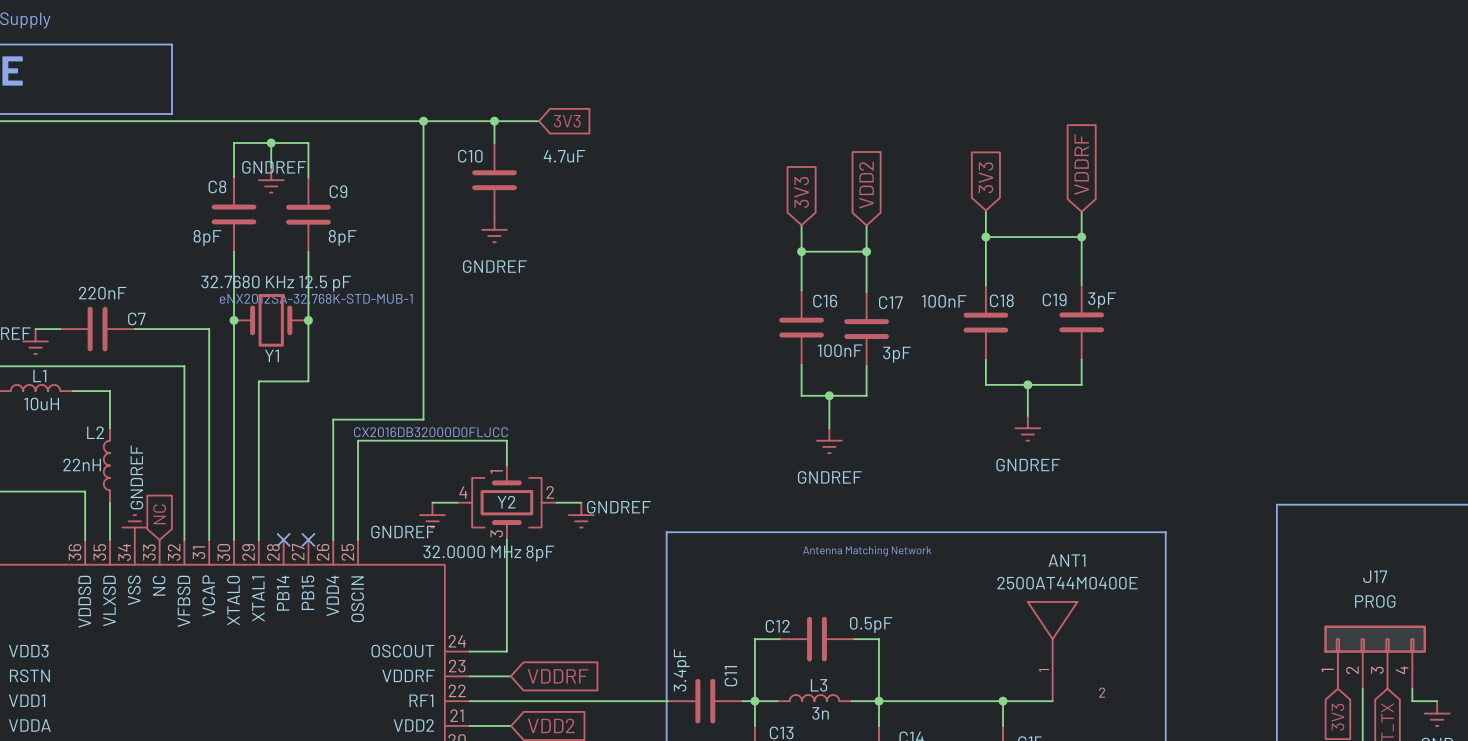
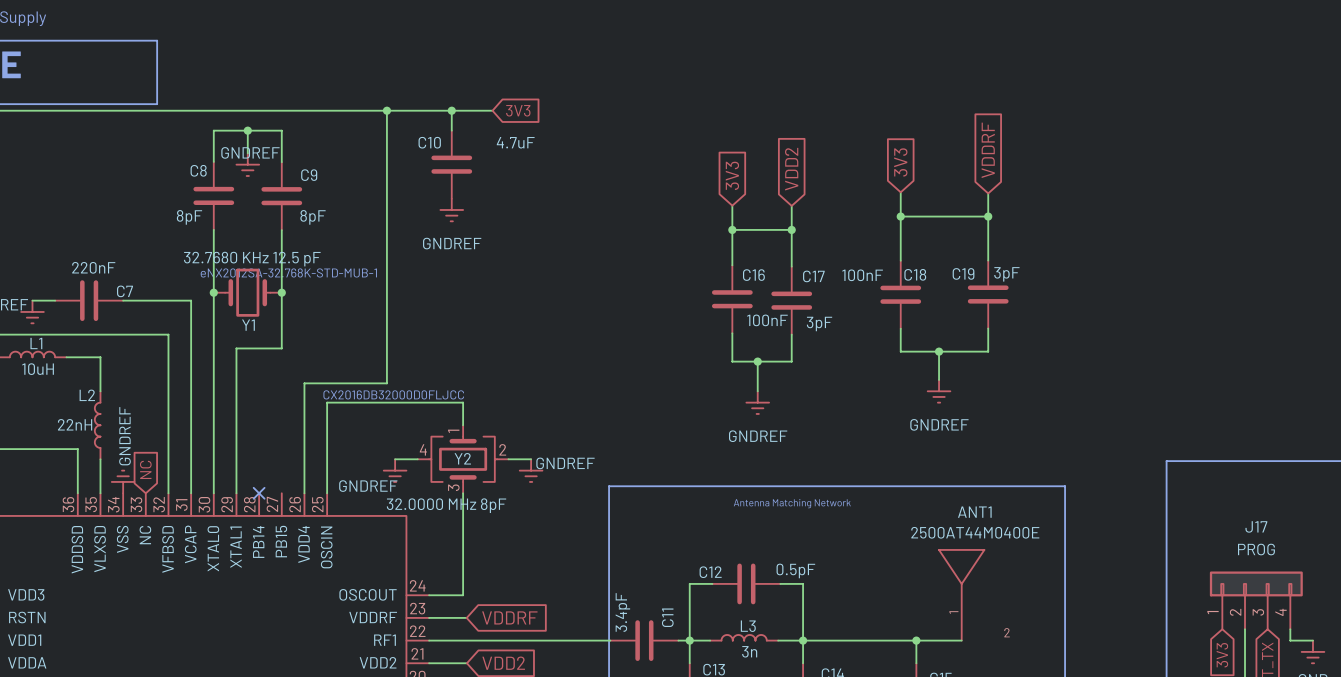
no-connect mark: (308, 539) -> none

